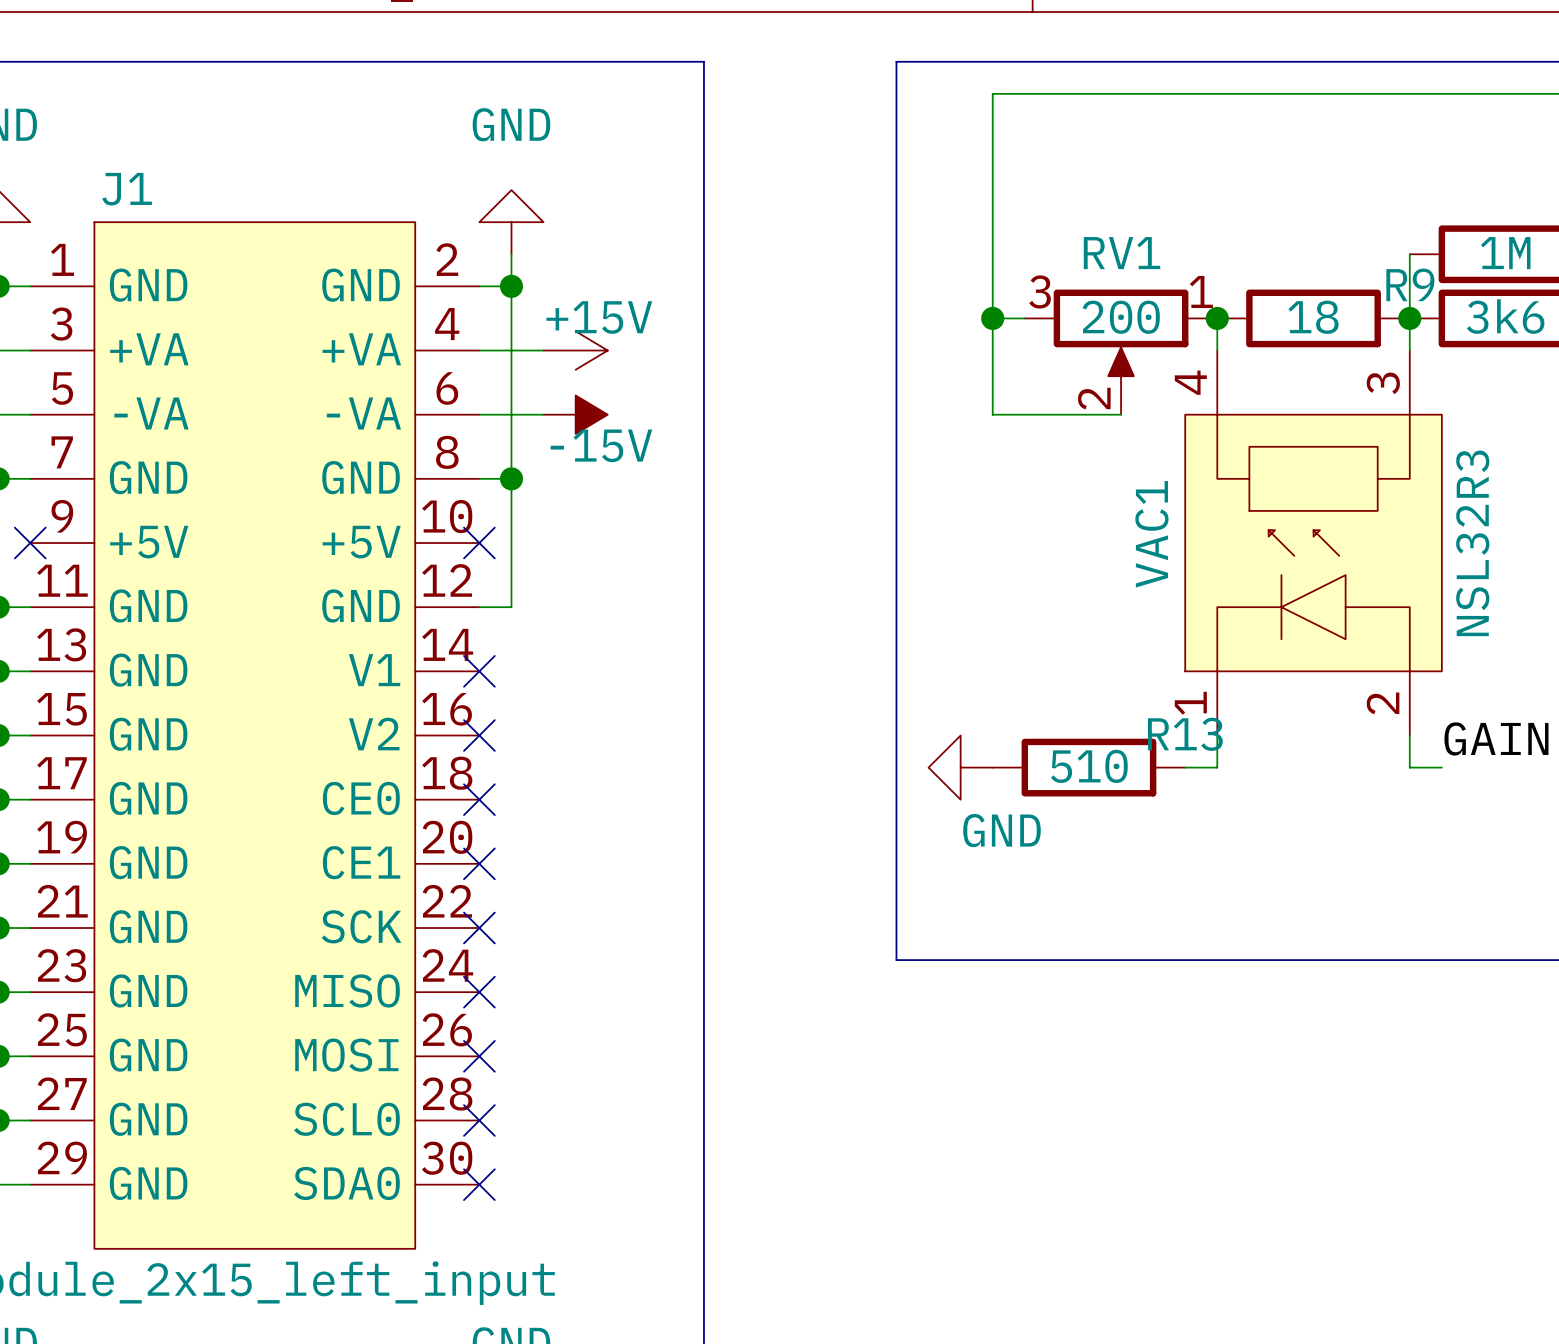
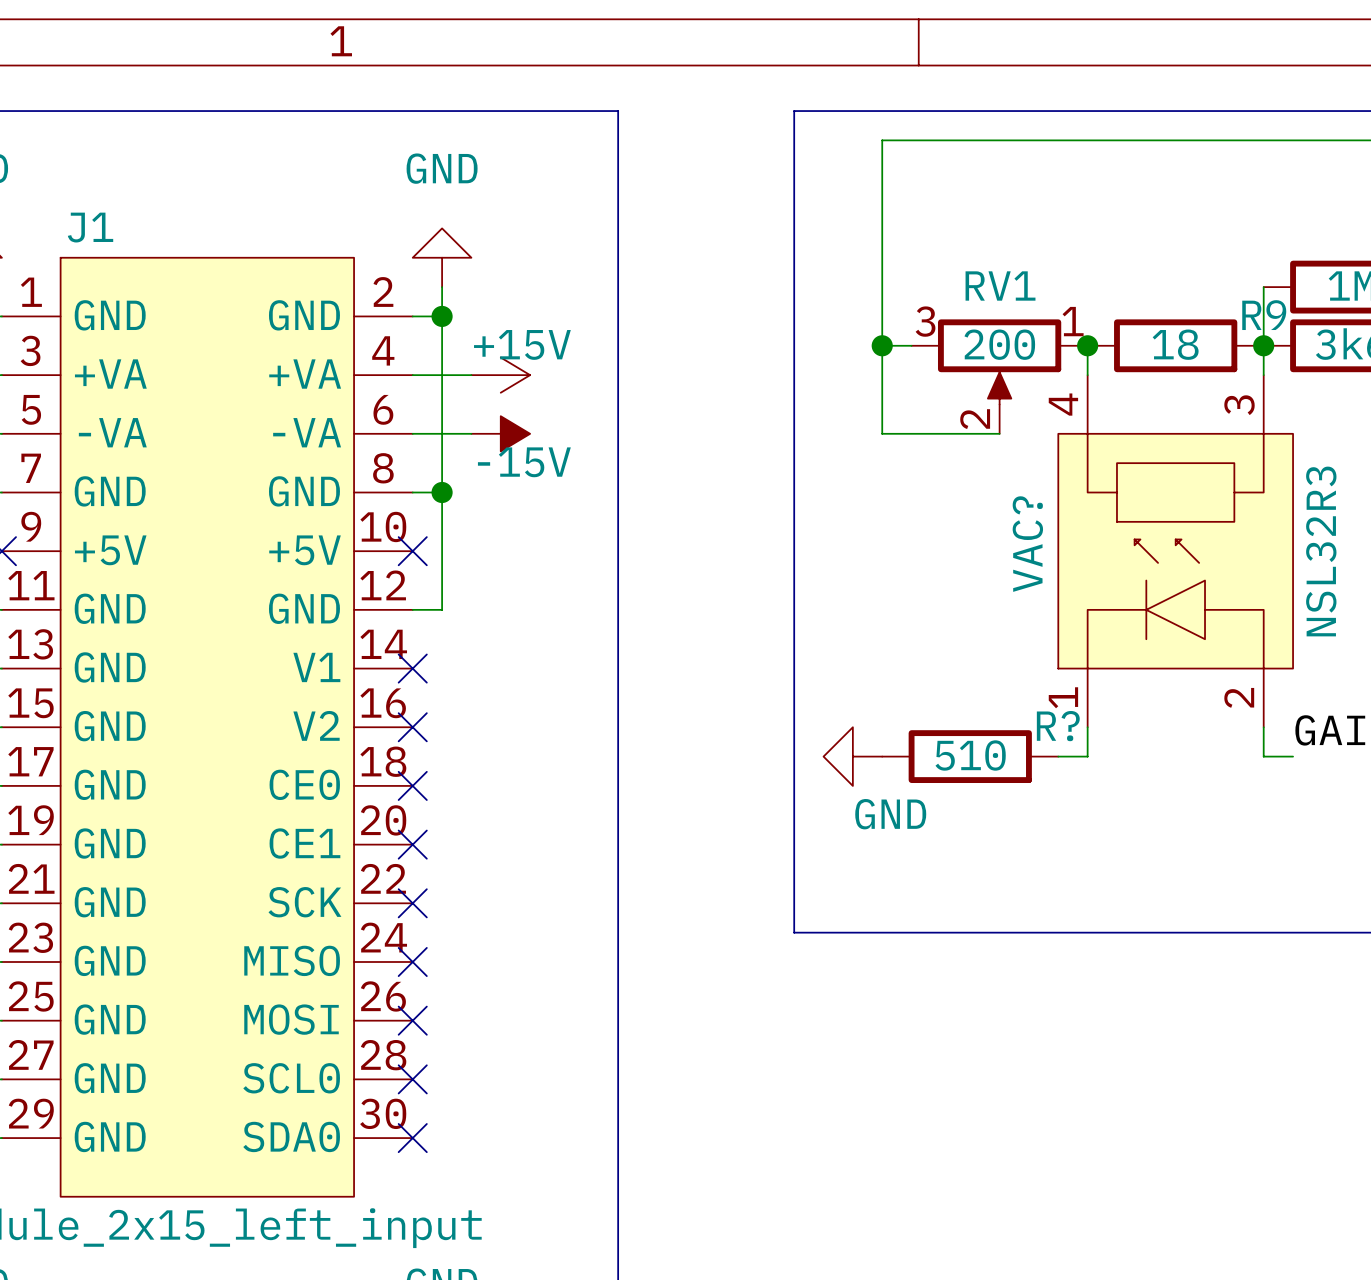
VAC1 name: VAC1 (1151, 534) -> VAC? (1027, 544)
R13 name: R13 (1185, 734) -> R? (1058, 726)

